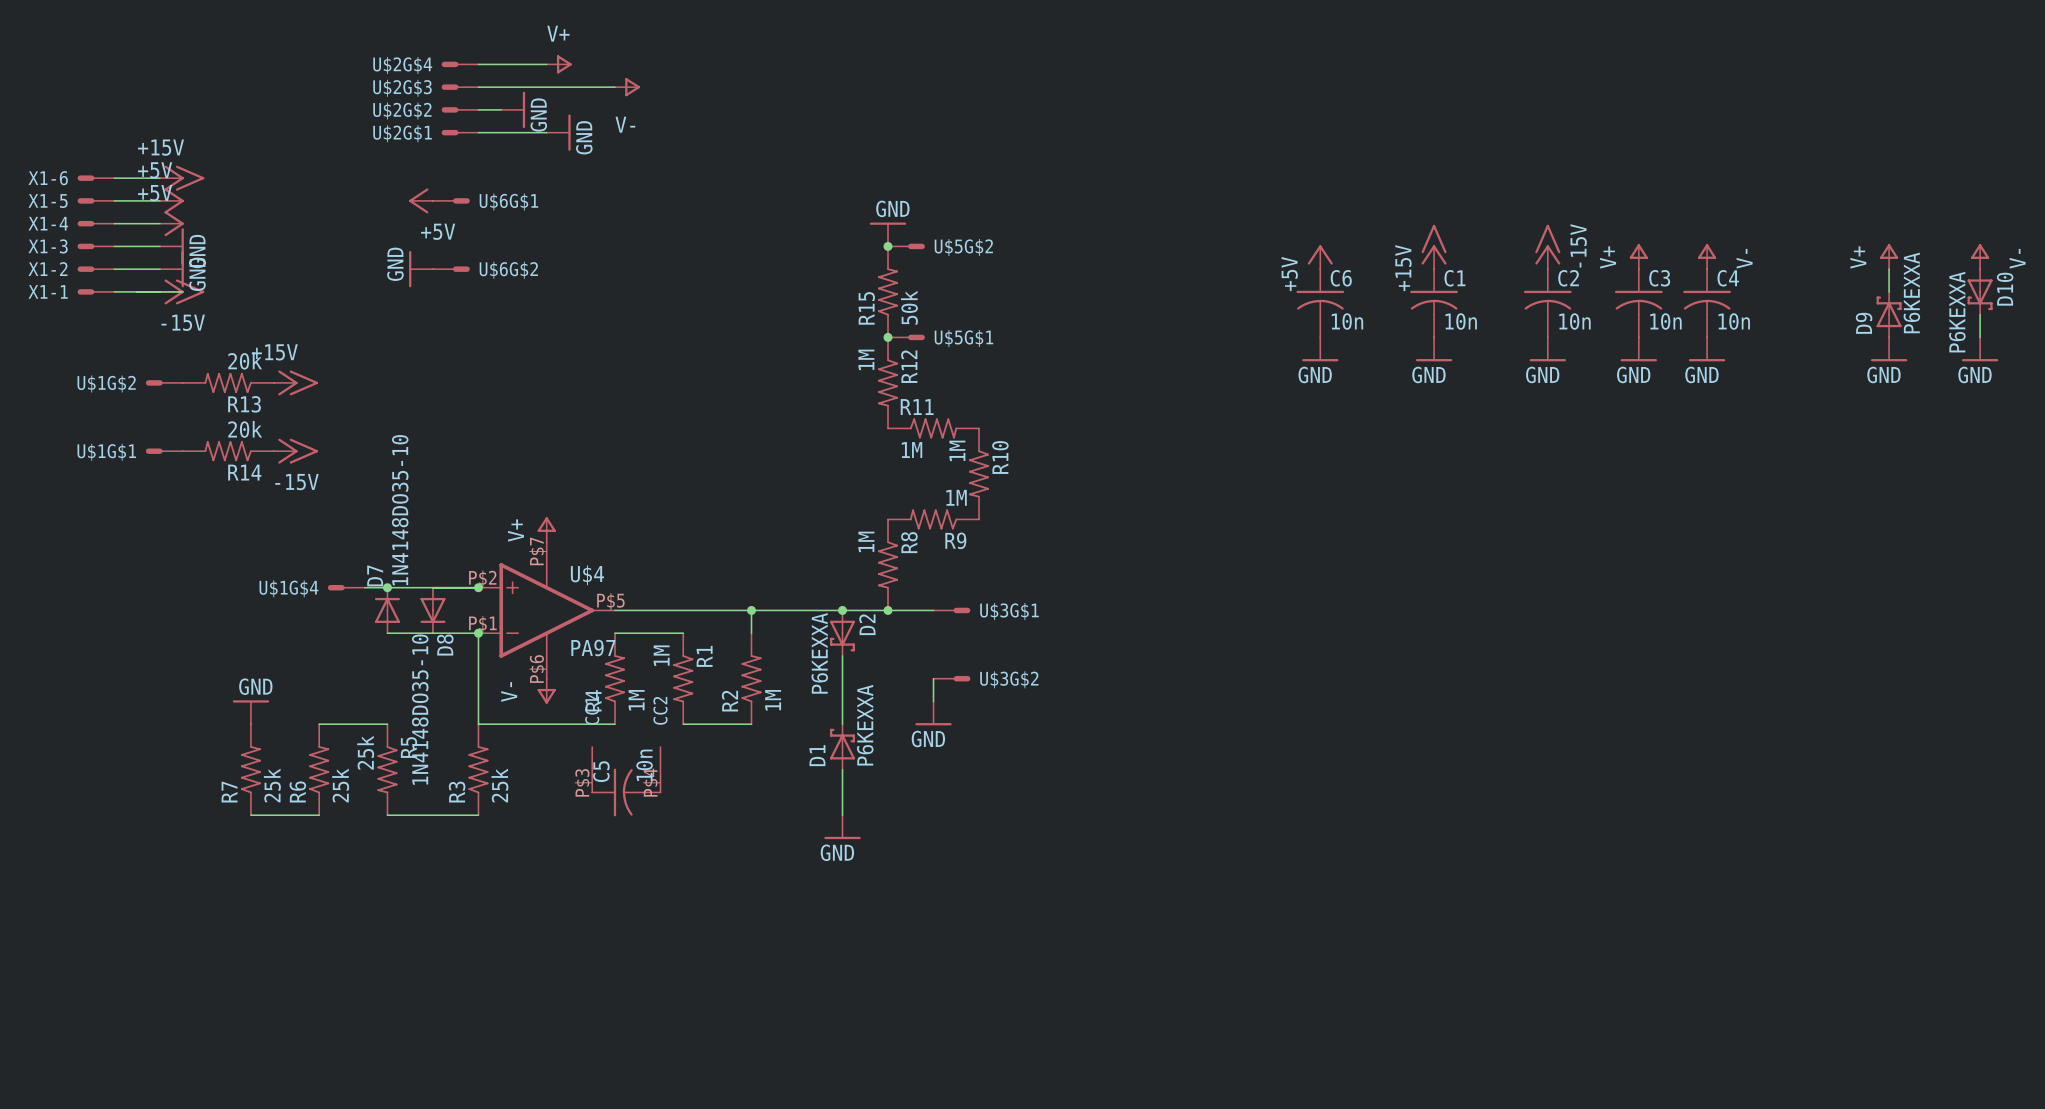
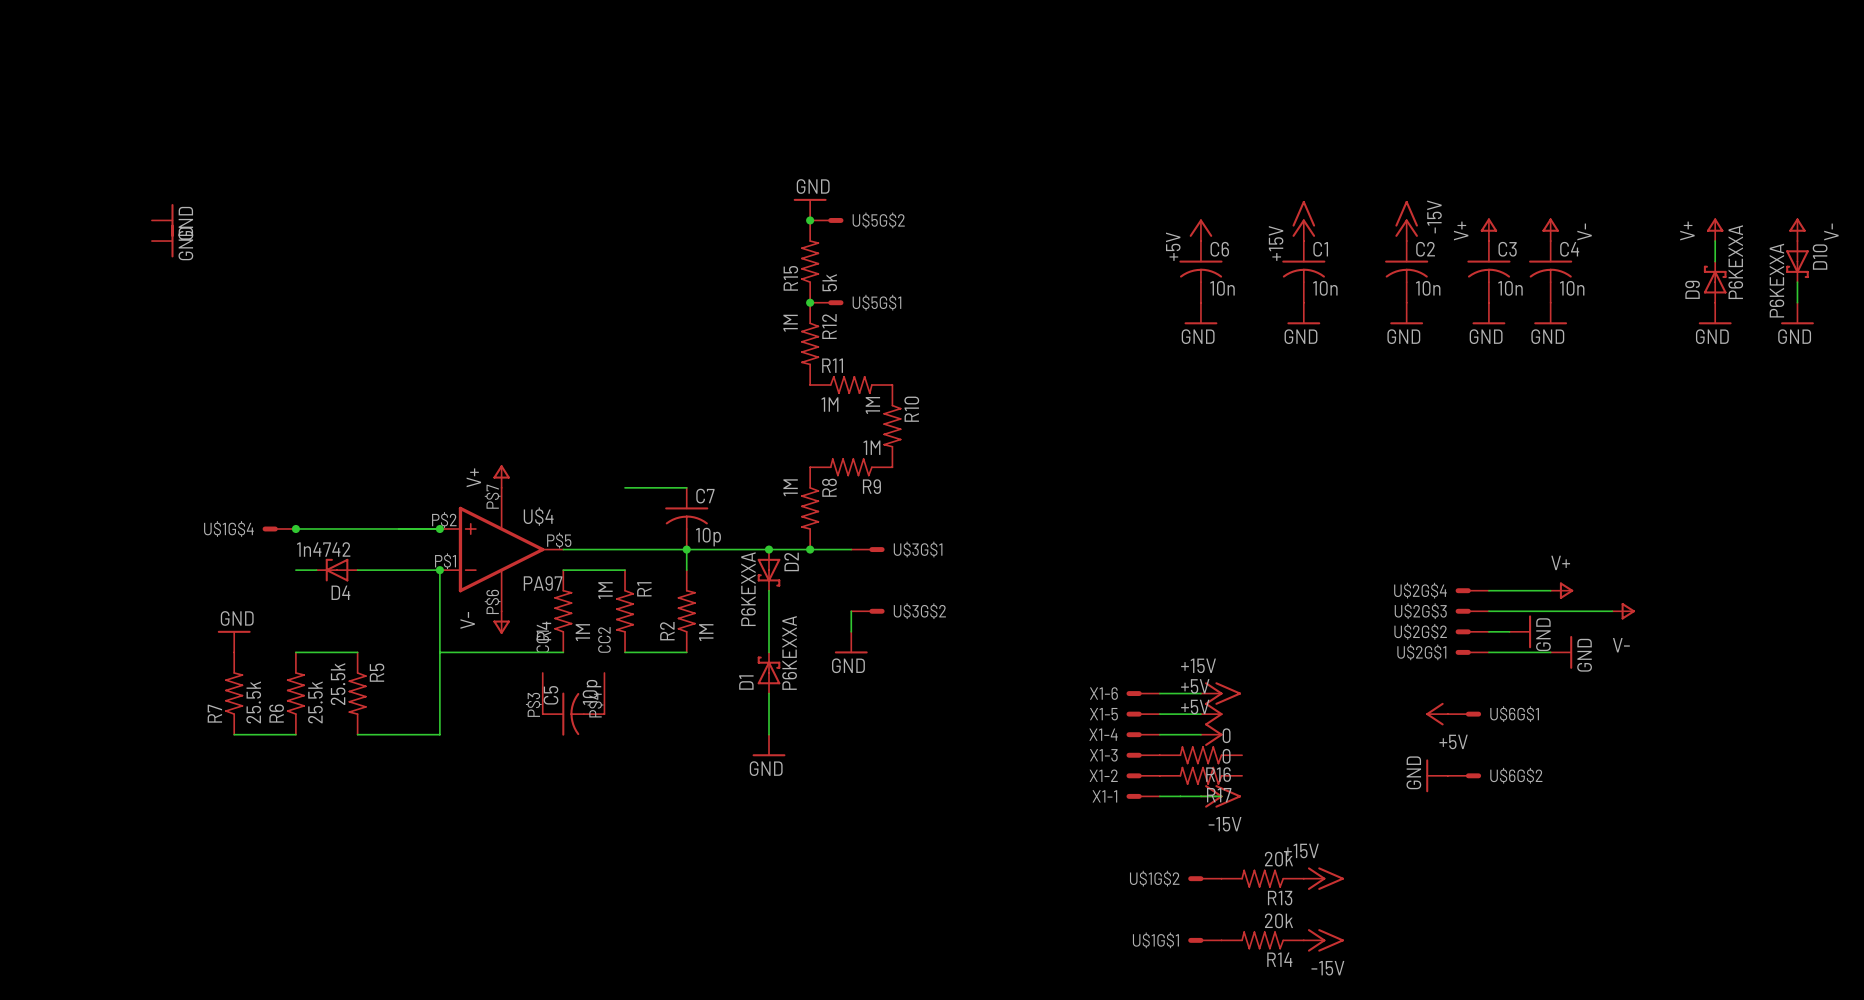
U$2G$4 position: (460, 64) -> (1472, 590)
wire: (478, 64) (546, 64) -> none
power symbol: V+ (559, 64) -> none
U$2G$3 position: (460, 87) -> (1472, 611)
wire: (478, 87) (614, 87) -> none
power symbol: V- (627, 87) -> none
U$2G$2 position: (460, 109) -> (1472, 631)
wire: (478, 109) (501, 109) -> none
power symbol: GND (513, 109) -> none
U$2G$1 position: (460, 132) -> (1472, 652)
wire: (478, 132) (546, 132) -> none
power symbol: GND (558, 132) -> none
X1-6 position: (96, 178) -> (1143, 693)
wire: (114, 178) (159, 178) -> none
power symbol: +15V (182, 178) -> none
X1-5 position: (96, 200) -> (1143, 714)
wire: (114, 200) (159, 200) -> none
power symbol: +5V (171, 200) -> none
power symbol: +5V (421, 200) -> none
U$6G$1 position: (451, 200) -> (1464, 714)
X1-4 position: (96, 223) -> (1143, 734)
wire: (114, 223) (159, 223) -> none
power symbol: +5V (171, 223) -> none
X1-3 position: (96, 246) -> (1143, 755)
wire: (114, 246) (159, 246) -> none
X1-2 position: (96, 269) -> (1143, 775)
wire: (114, 269) (159, 269) -> none
power symbol: GND (421, 269) -> none
U$6G$2 position: (451, 269) -> (1464, 775)
X1-1 position: (96, 291) -> (1143, 796)
wire: (114, 291) (182, 291) -> none
power symbol: -15V (182, 291) -> none
R15 value: 50k (909, 307) -> 5k (829, 282)
U$1G$2 position: (164, 382) -> (1204, 878)
R13 position: (228, 382) -> (1262, 878)
power symbol: +15V (295, 382) -> none
U$1G$1 position: (164, 451) -> (1204, 940)
R14 position: (228, 451) -> (1262, 940)
power symbol: -15V (295, 451) -> none
wire: none -> (625, 487) (686, 487)
C7: none -> 10p (686, 518)
junction: none -> (295, 528)
U$1G$4 position: (346, 587) -> (279, 528)
junction: (387, 587) -> none
D7: 1N4148DO35-10 (387, 610) -> none
D8: 1N4148DO35-10 (432, 610) -> none
wire: none -> (295, 570) (316, 570)
D4: none -> 1n4742 (337, 570)
wire: none -> (1488, 590) (1550, 590)
power symbol: none -> V+ (1561, 590)
wire: none -> (1488, 611) (1612, 611)
power symbol: none -> V- (1623, 611)
wire: none -> (1488, 631) (1509, 631)
power symbol: none -> GND (1520, 631)
wire: none -> (1488, 652) (1550, 652)
power symbol: none -> GND (1561, 652)
R5 value: 25k (365, 752) -> 25.5k (338, 684)
C5 value: 10n (644, 765) -> 10p (591, 692)
R3: 25k (478, 769) -> none
wire: none -> (1159, 693) (1200, 693)
power symbol: none -> +15V (1221, 693)
R7 value: 25k (272, 785) -> 25.5k (253, 702)
R6 value: 25k (340, 785) -> 25.5k (315, 702)
wire: none -> (1159, 714) (1200, 714)
power symbol: none -> +5V (1211, 714)
power symbol: none -> +5V (1436, 714)
wire: none -> (1159, 734) (1200, 734)
power symbol: none -> +5V (1211, 734)
R16: none -> 0 (1200, 755)
R17: none -> 0 (1200, 775)
power symbol: none -> GND (1436, 775)
wire: none -> (1159, 796) (1221, 796)
power symbol: none -> -15V (1221, 796)
power symbol: none -> +15V (1323, 878)
power symbol: none -> -15V (1323, 940)

